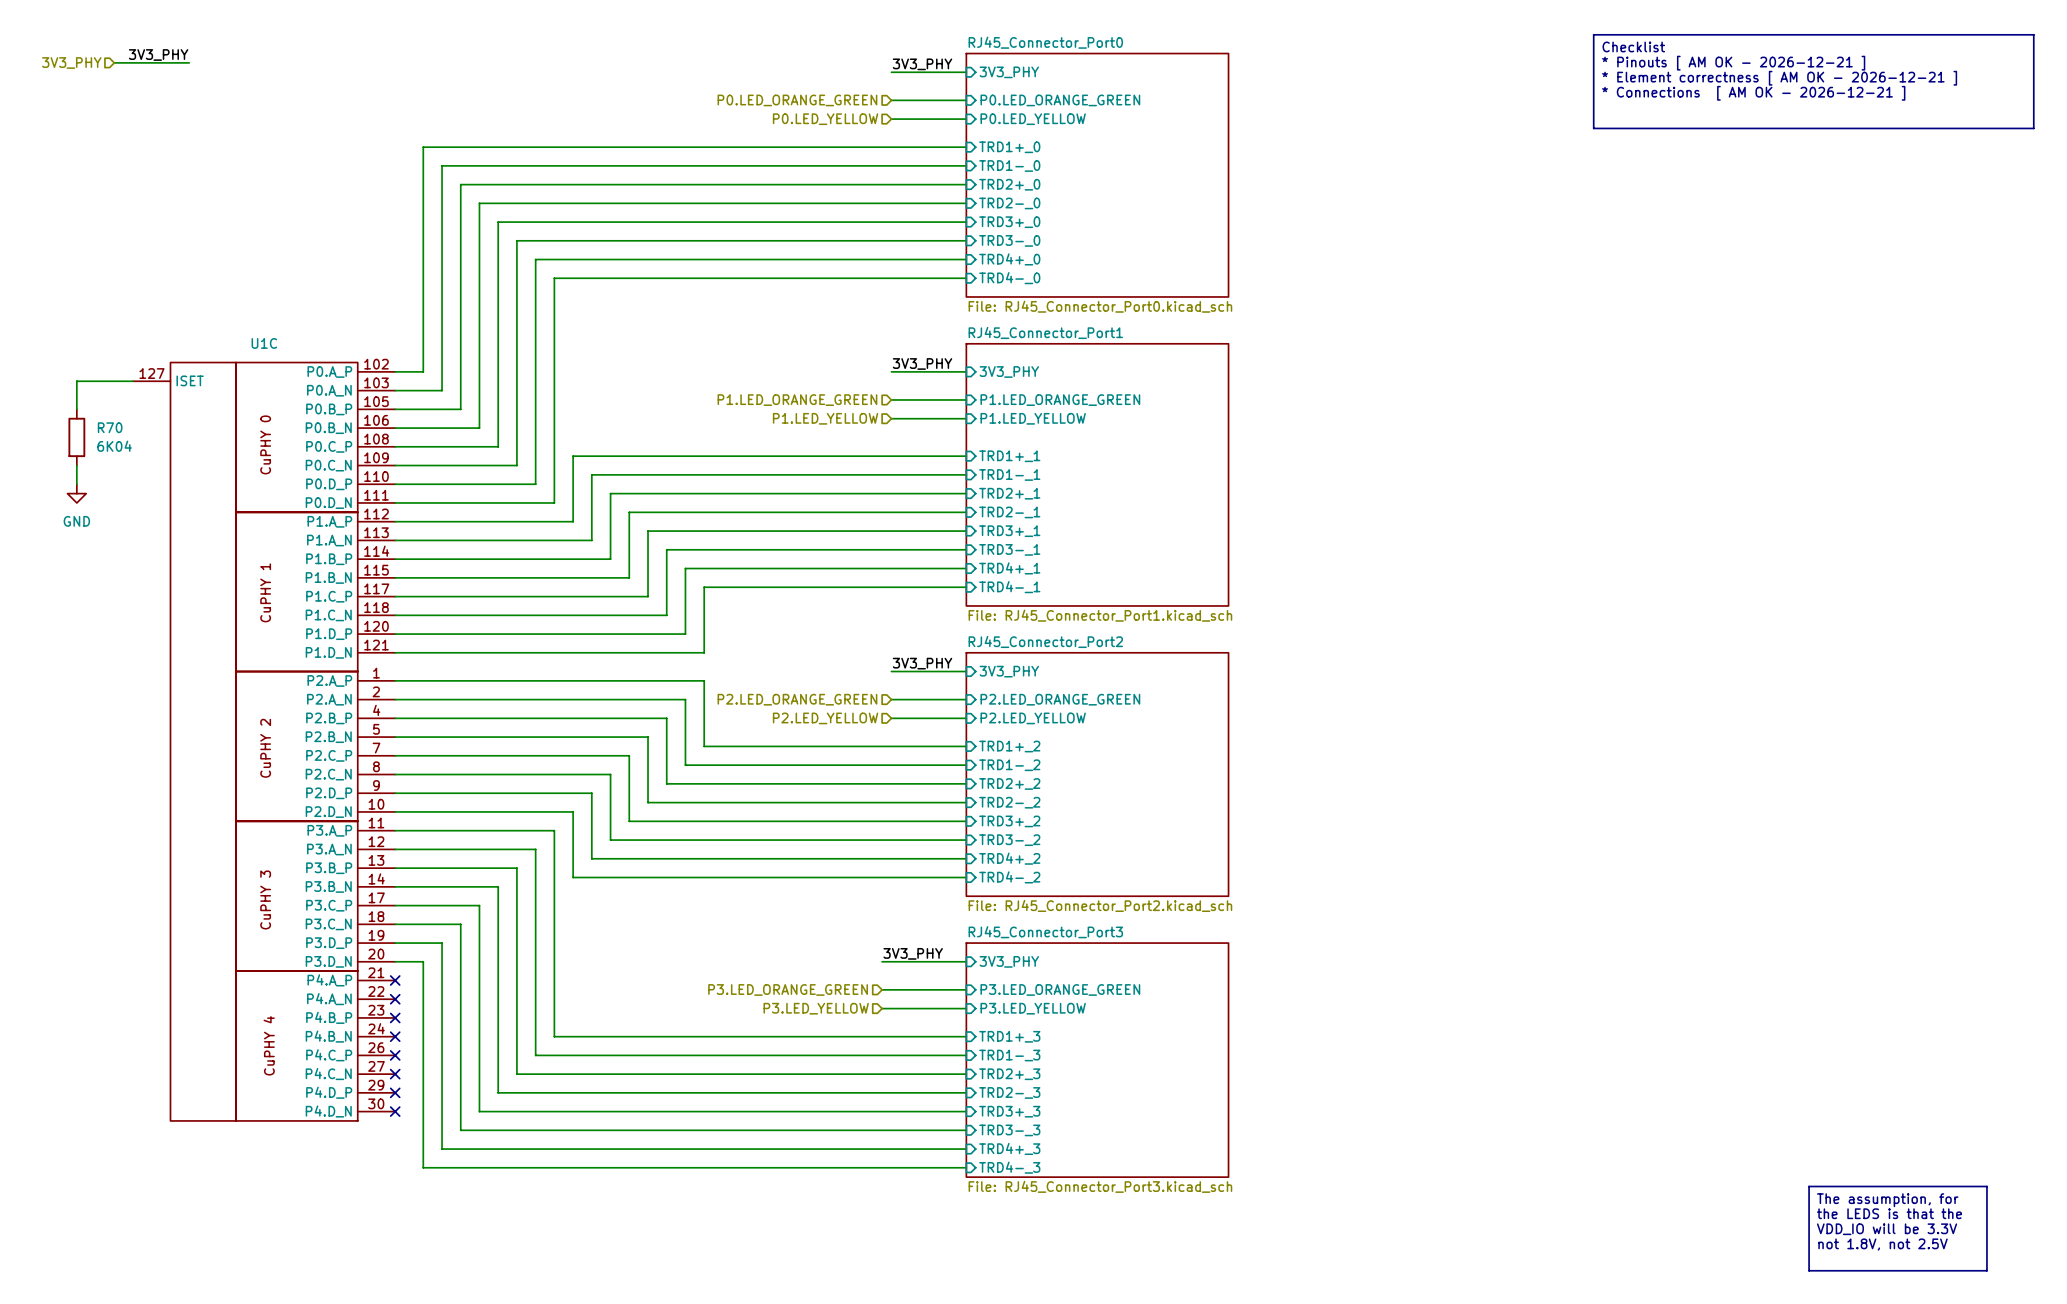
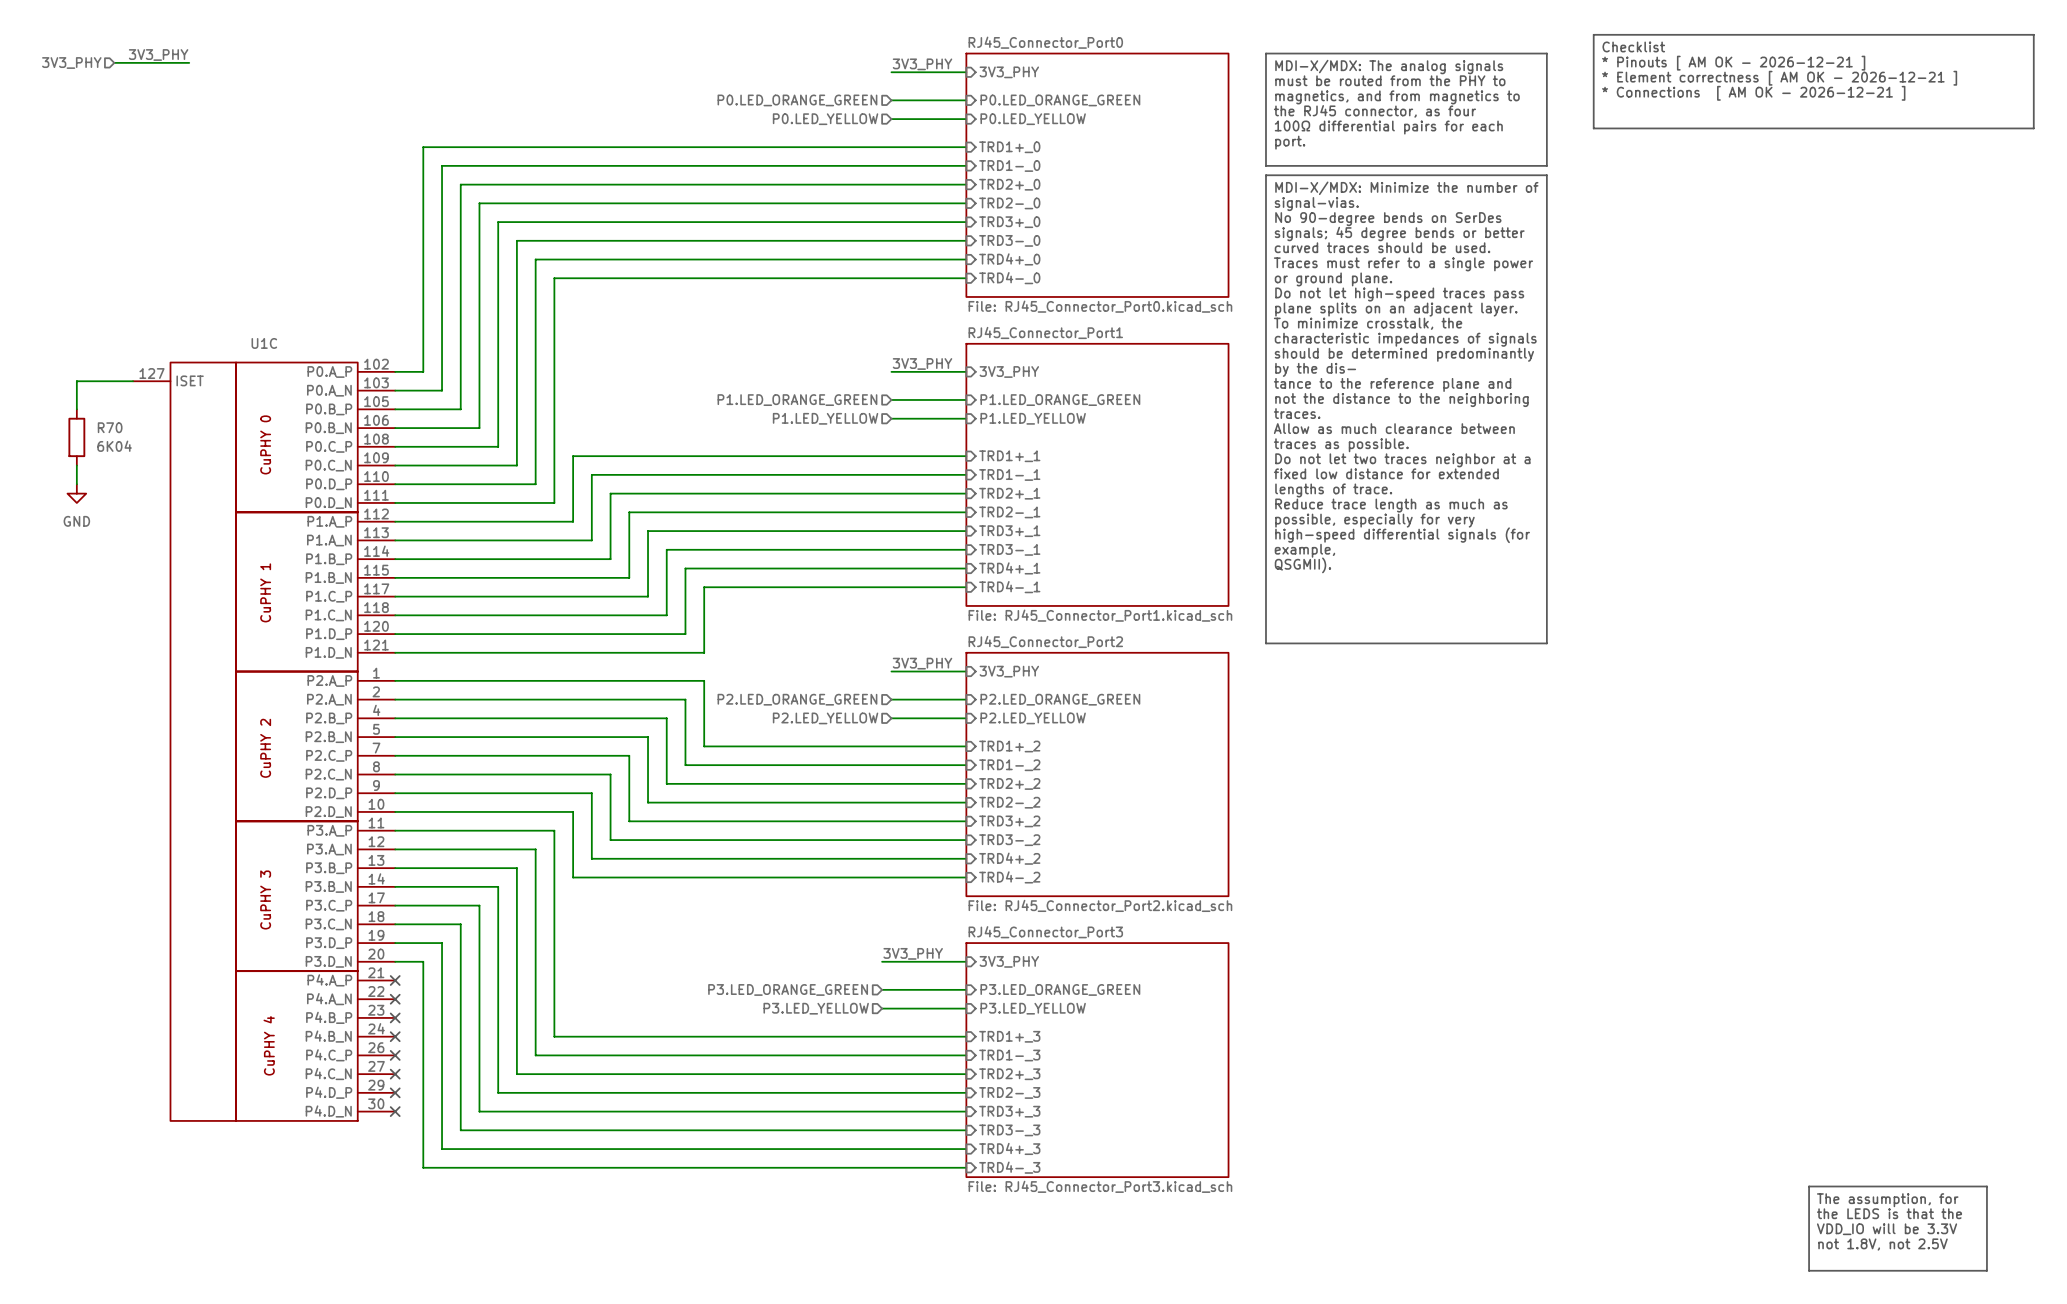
line: none -> (1265, 53) (1265, 165) (1546, 165) (1546, 53) (1265, 53)
text: none -> MDI-X/MDX: The analog signals (1389, 67)
text: none -> must be routed from the PHY to (1390, 80)
text: none -> magnetics, and from magnetics to (1397, 97)
text: none -> the RJ45 connector, as four (1374, 111)
text: none -> 100Ω differential pairs for each (1388, 127)
text: none -> port. (1290, 142)
line: none -> (1265, 175) (1546, 175) (1546, 643) (1265, 643) (1265, 175)
text: none -> MDI-X/MDX: Minimize the number of (1406, 188)
text: none -> signal-vias. (1316, 204)
text: none -> No 90-degree bends on SerDes (1388, 219)
text: none -> signals; 45 degree bends or better (1399, 233)
text: none -> curved traces should be used. (1382, 247)
text: none -> Traces must refer to a single power (1403, 264)
text: none -> or ground plane. (1333, 279)
text: none -> Do not let high-speed traces pass (1399, 294)
text: none -> plane splits on an adjacent layer. (1396, 309)
text: none -> To minimize crosstalk, the (1368, 323)
text: none -> characteristic impedances of signals (1405, 339)
text: none -> should be determined predominantly (1404, 354)
text: none -> by the dis- (1315, 369)
text: none -> tance to the reference plane and (1392, 384)
text: none -> not the distance to the neighboring (1401, 400)
text: none -> traces. (1297, 413)
text: none -> Allow as much clearance between (1394, 428)
text: none -> traces as possible. (1341, 445)
text: none -> Do not let two traces neighbor at a (1402, 460)
text: none -> fixed low distance for extended (1386, 473)
text: none -> lengths of trace. (1333, 490)
text: none -> Reduce trace length as much as (1391, 505)
text: none -> possible, especially for very (1374, 520)
text: none -> high-speed differential signals (for (1402, 535)
text: none -> example, (1304, 550)
text: none -> QSGMII). (1302, 565)

